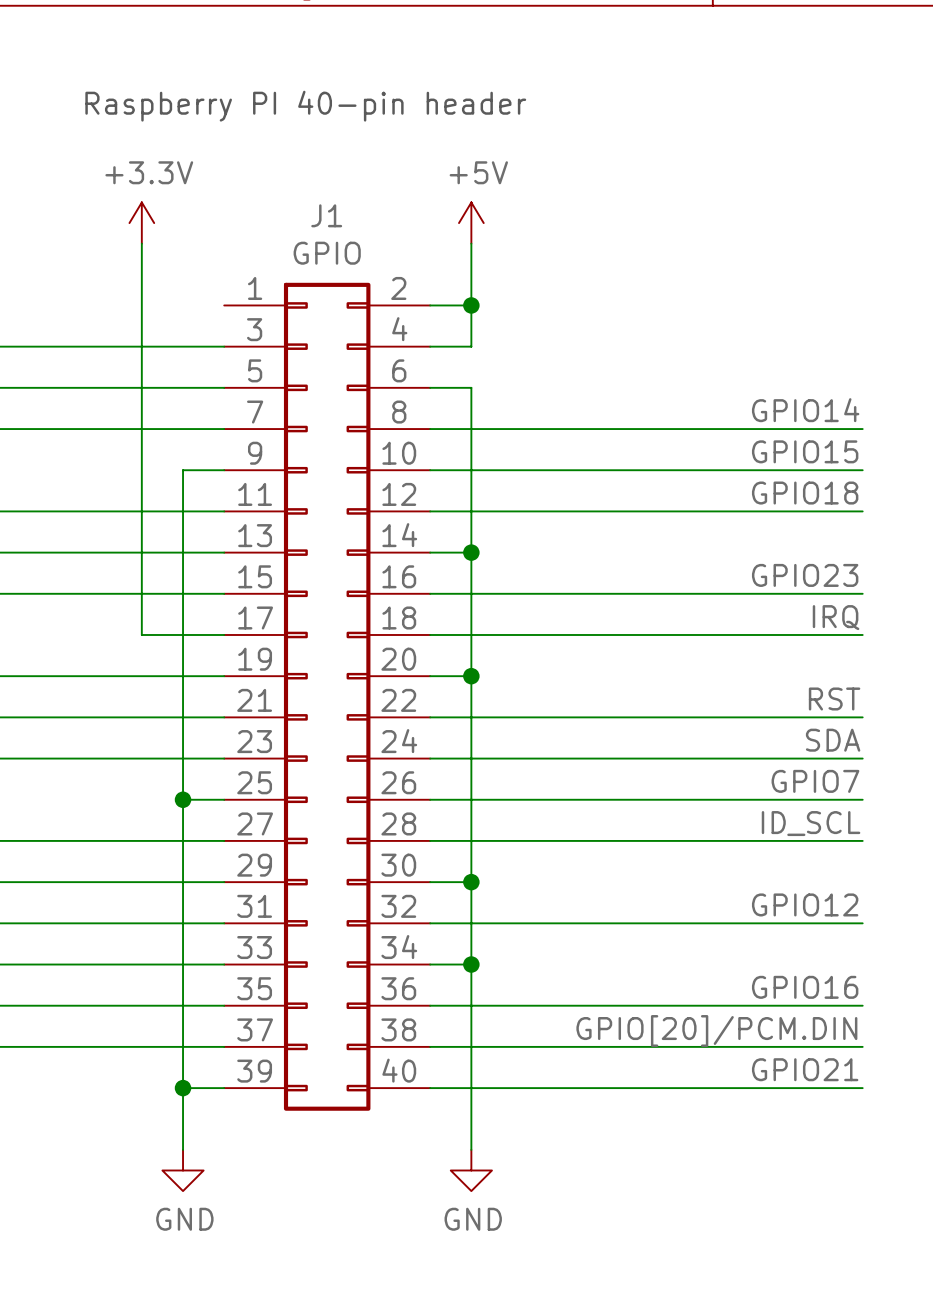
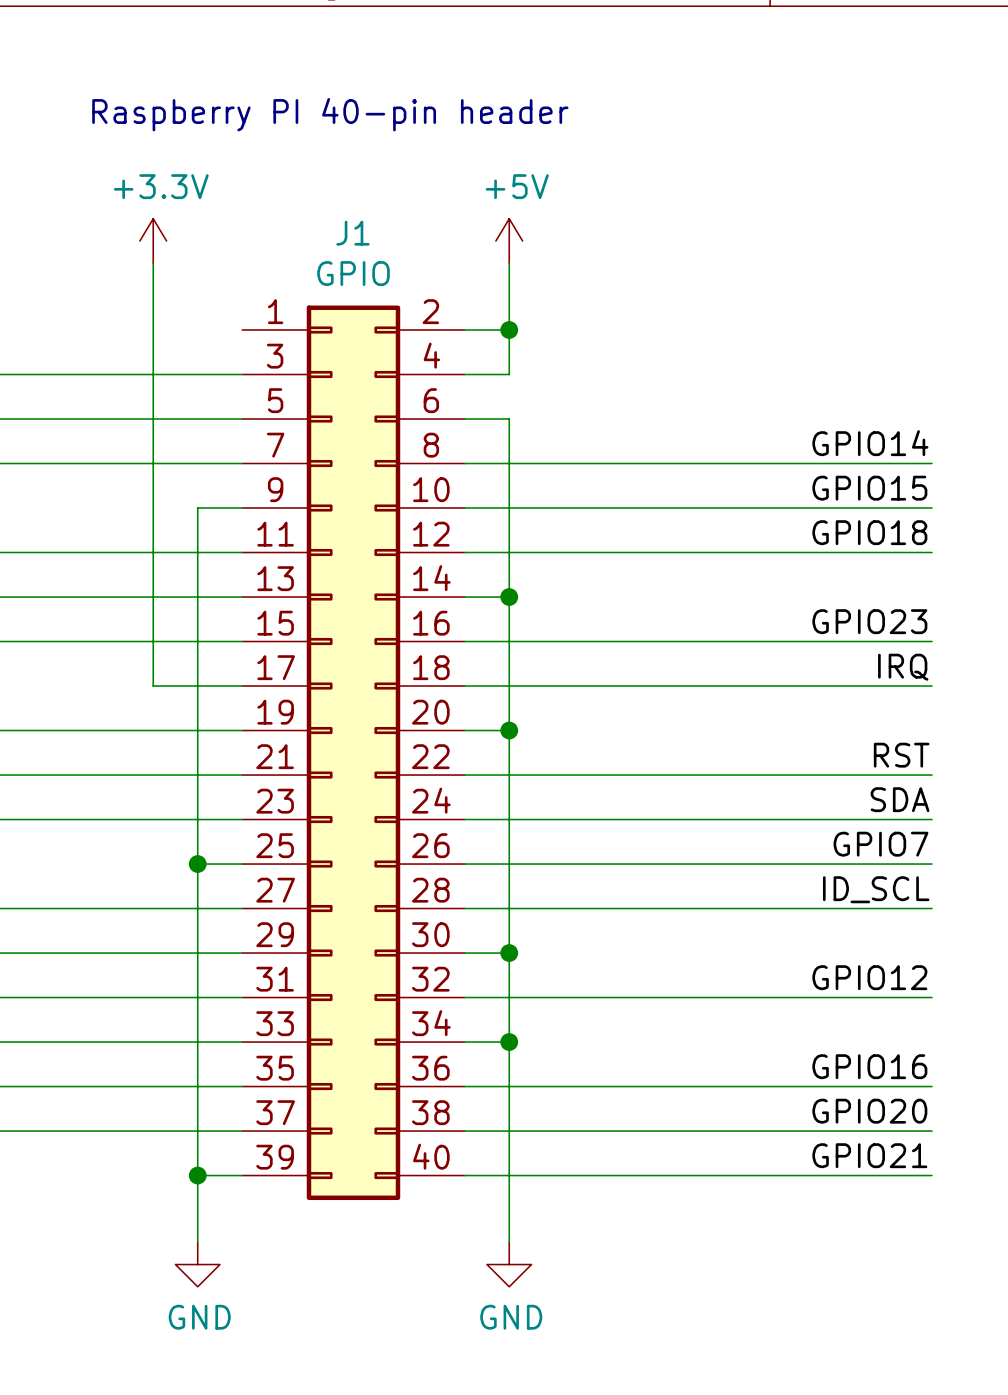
label: GPIO[20]/PCM.DIN (716, 1030) -> GPIO20 (869, 1111)

